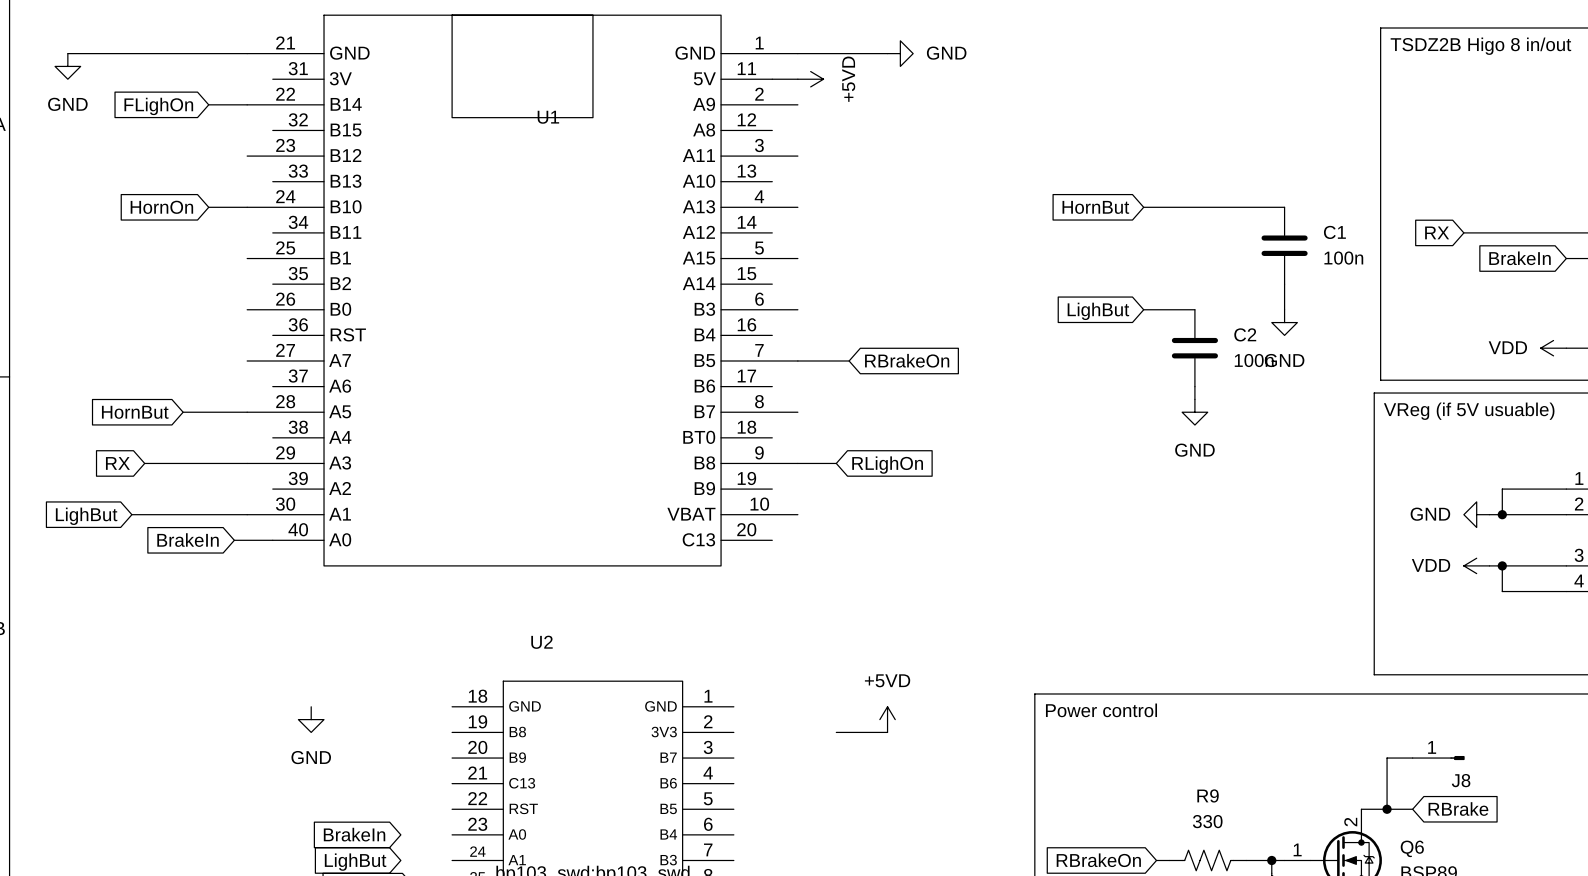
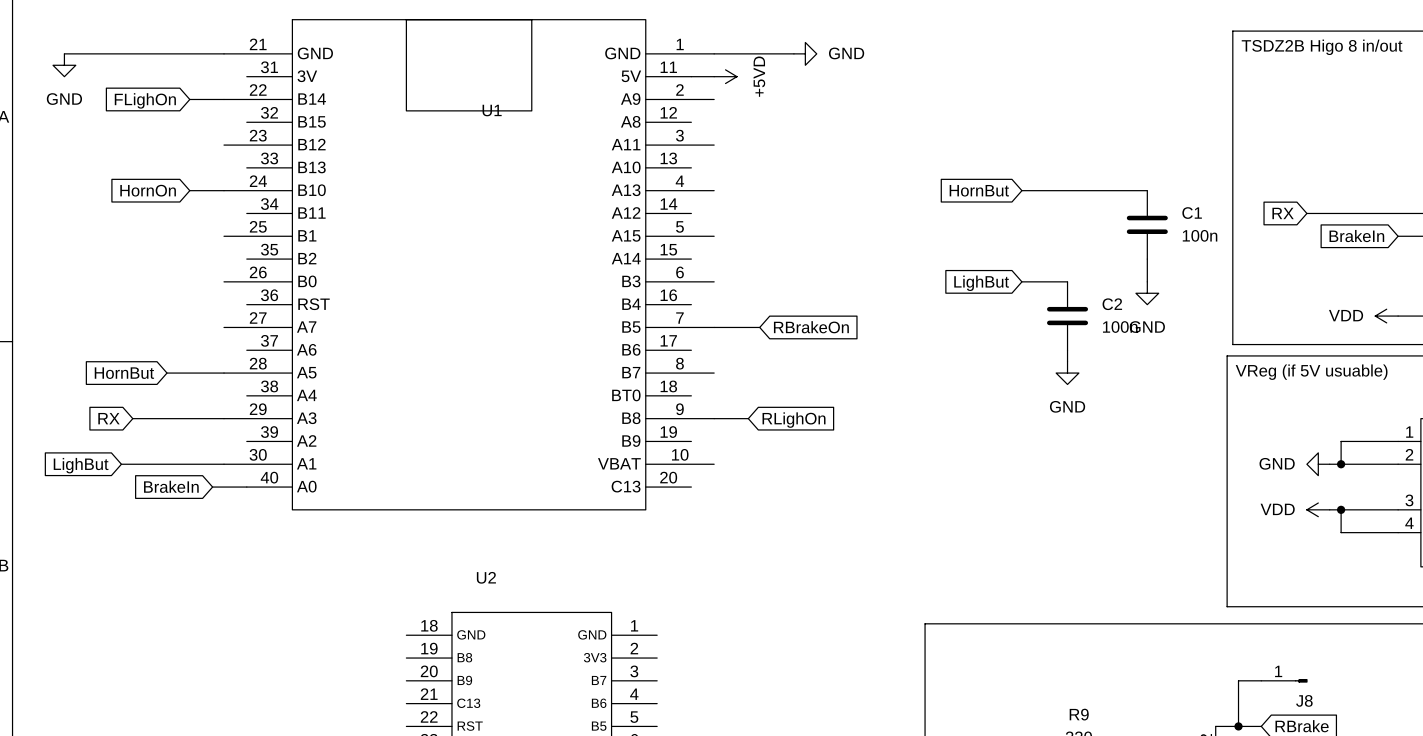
text: Power control (1101, 710) -> none
power symbol: GND (311, 719) -> none
power symbol: +5VD (887, 719) -> none
wire: (836, 732) (887, 732) -> none

